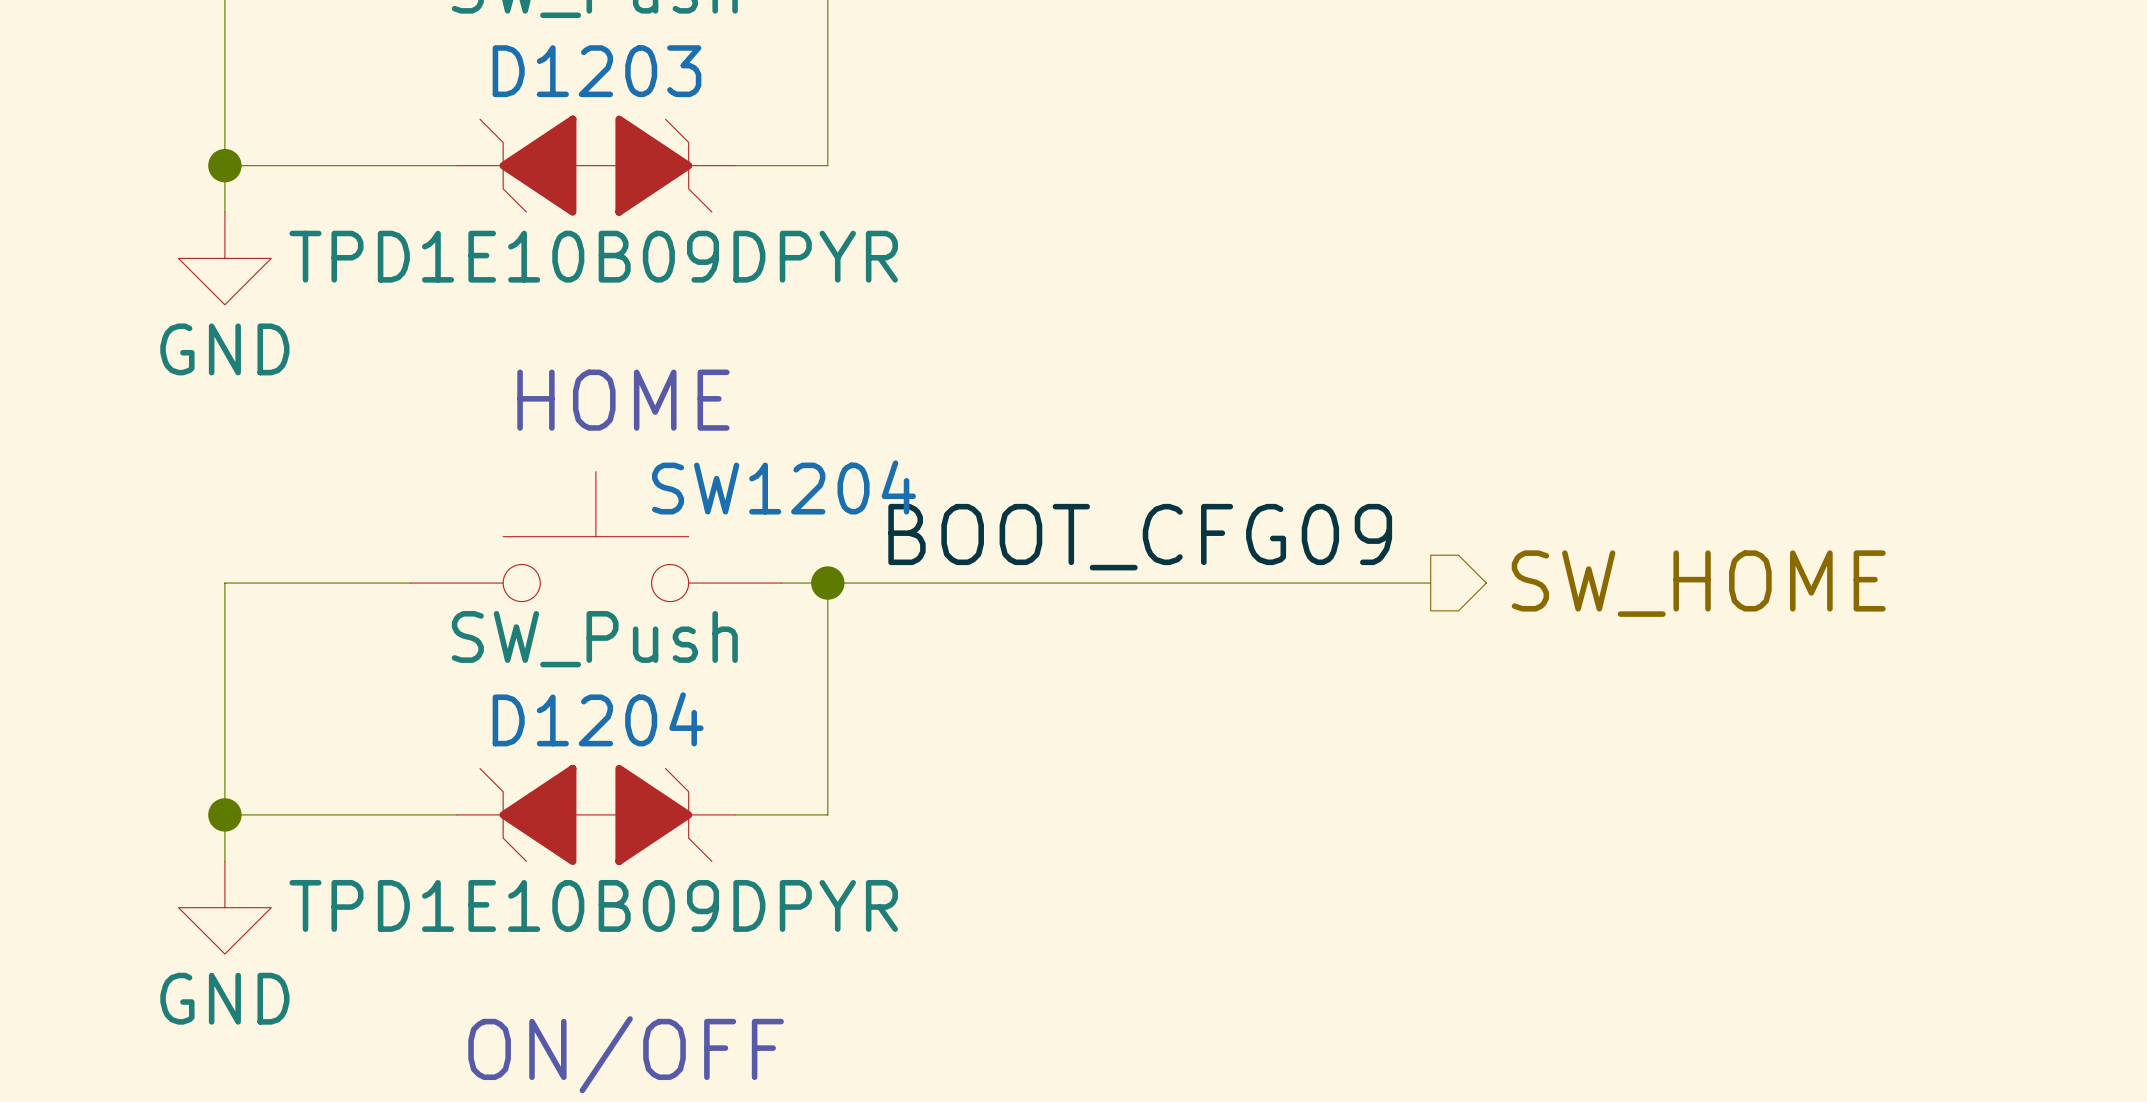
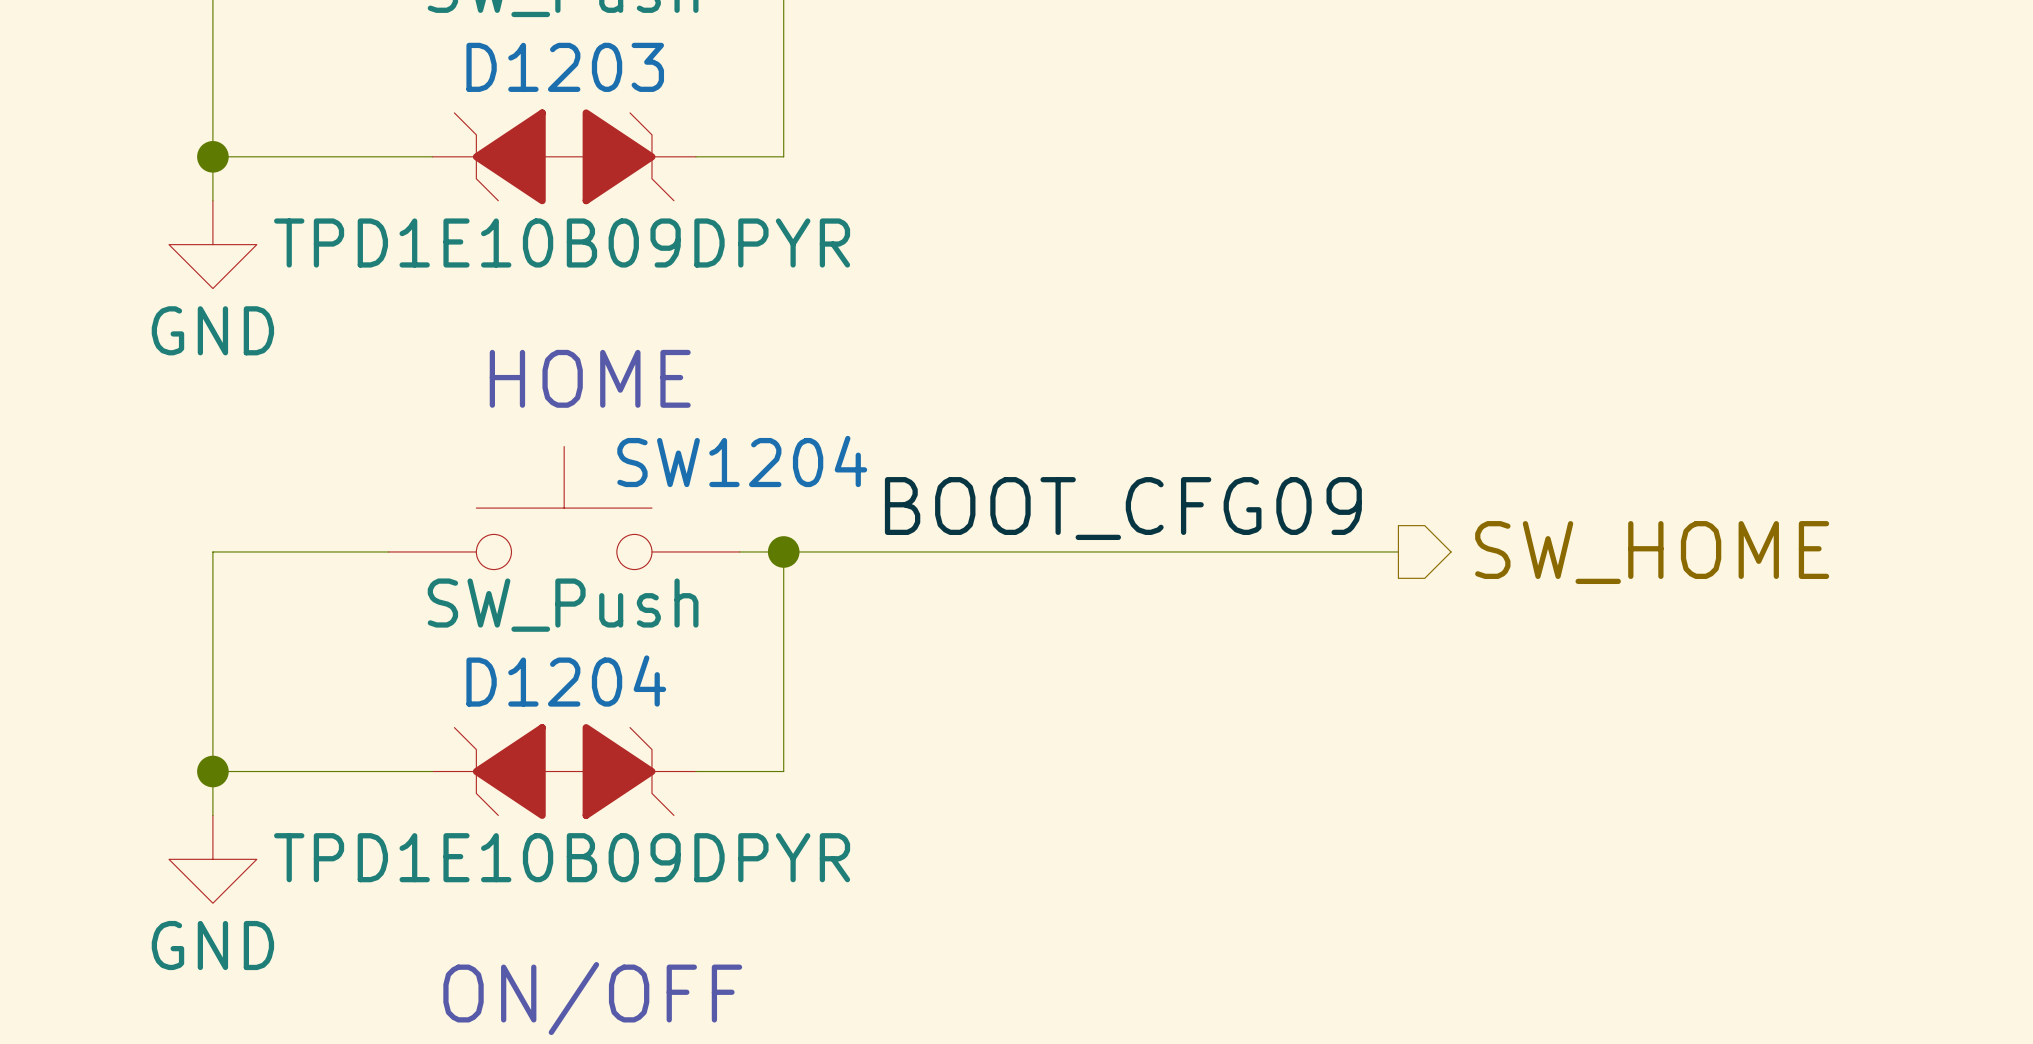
label position: BOOT_CFG09 (1140, 537) -> BOOT_CFG09 (1123, 508)
wire: none -> (1354, 551) (1398, 551)
hierarchical label position: SW_HOME (1698, 583) -> SW_HOME (1652, 552)

